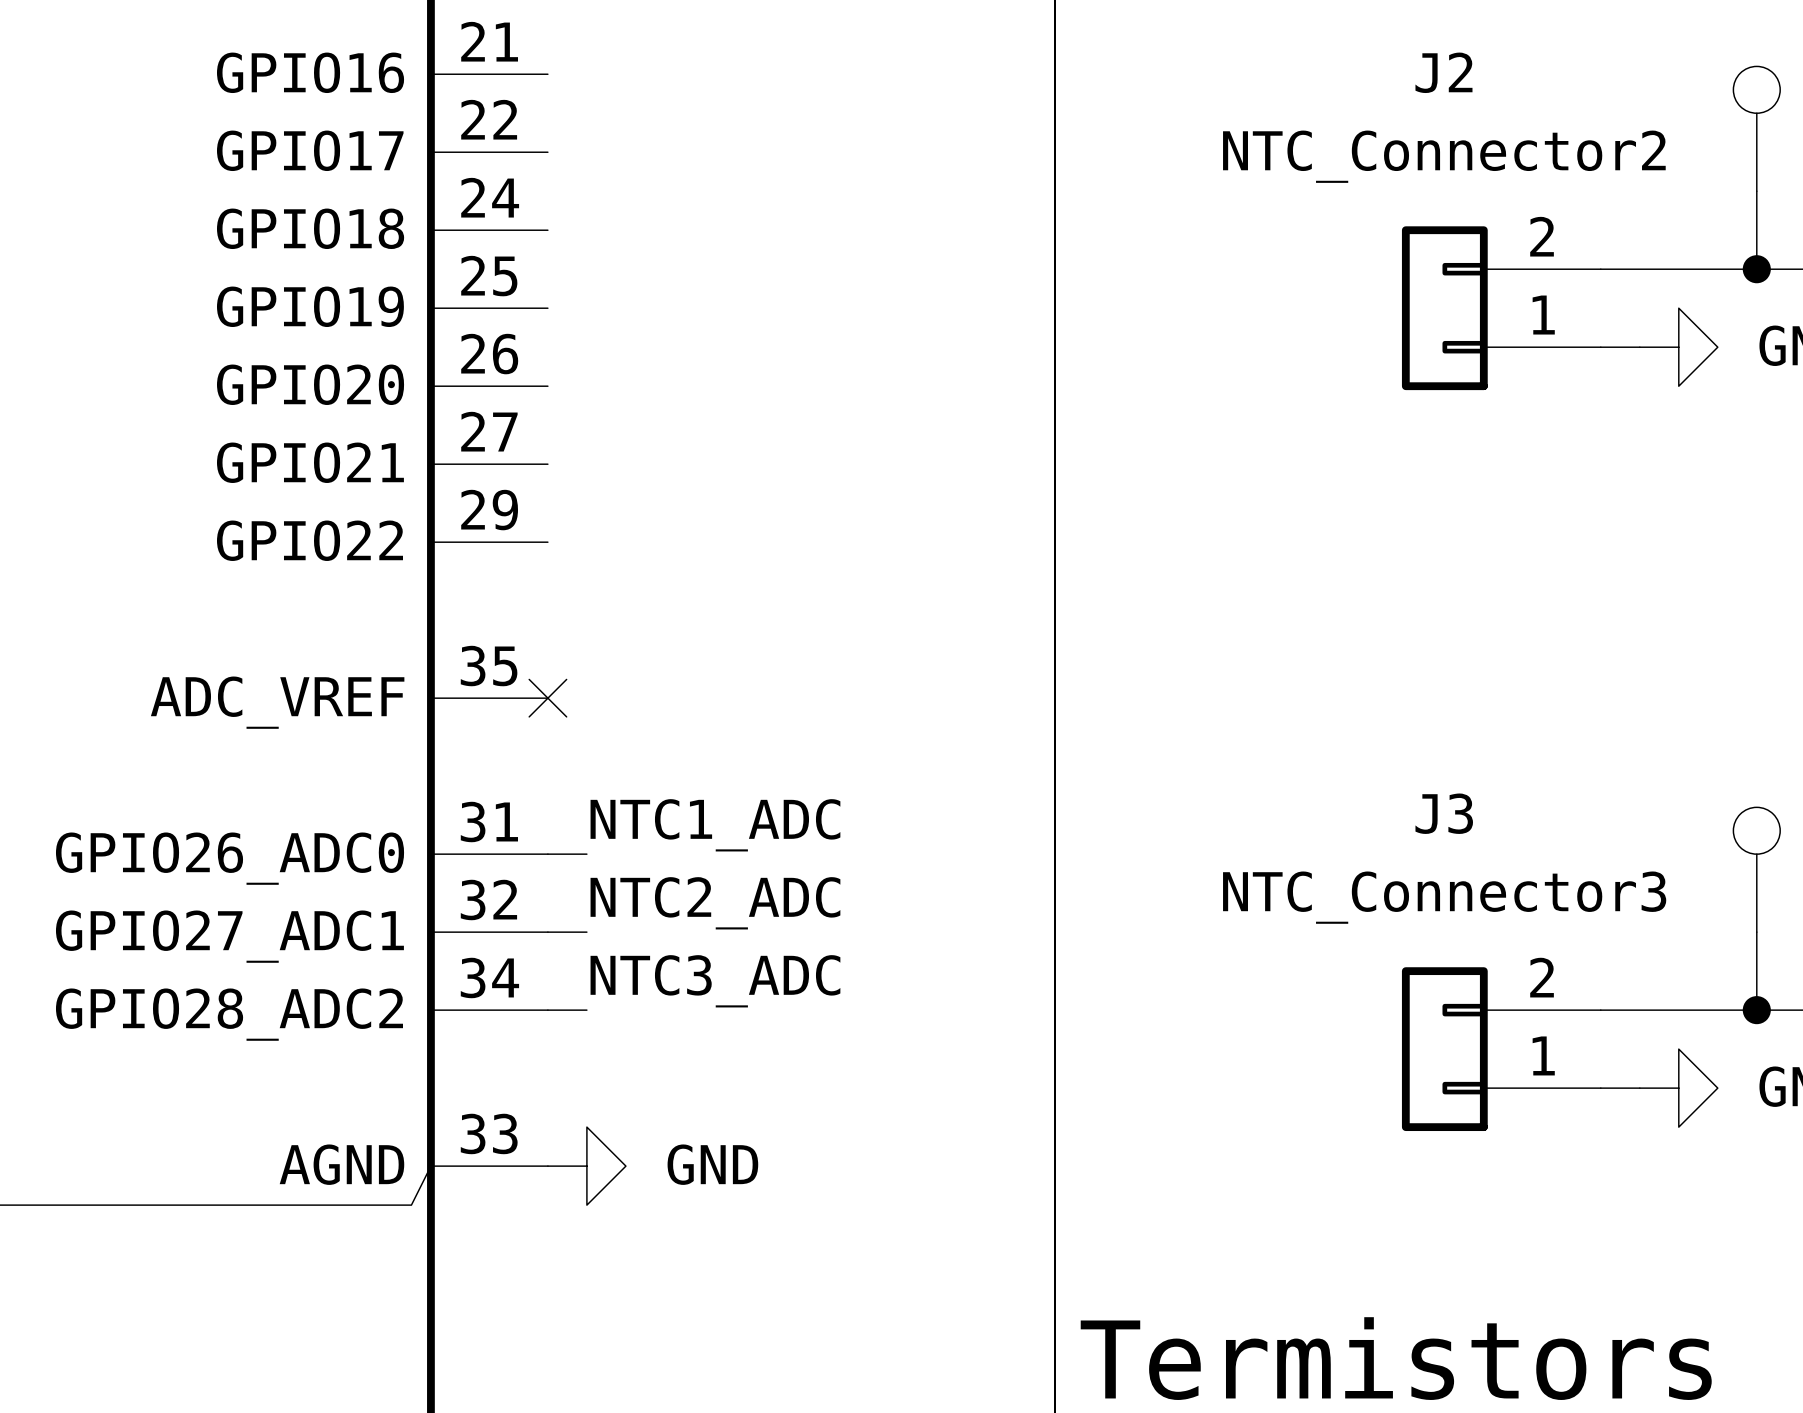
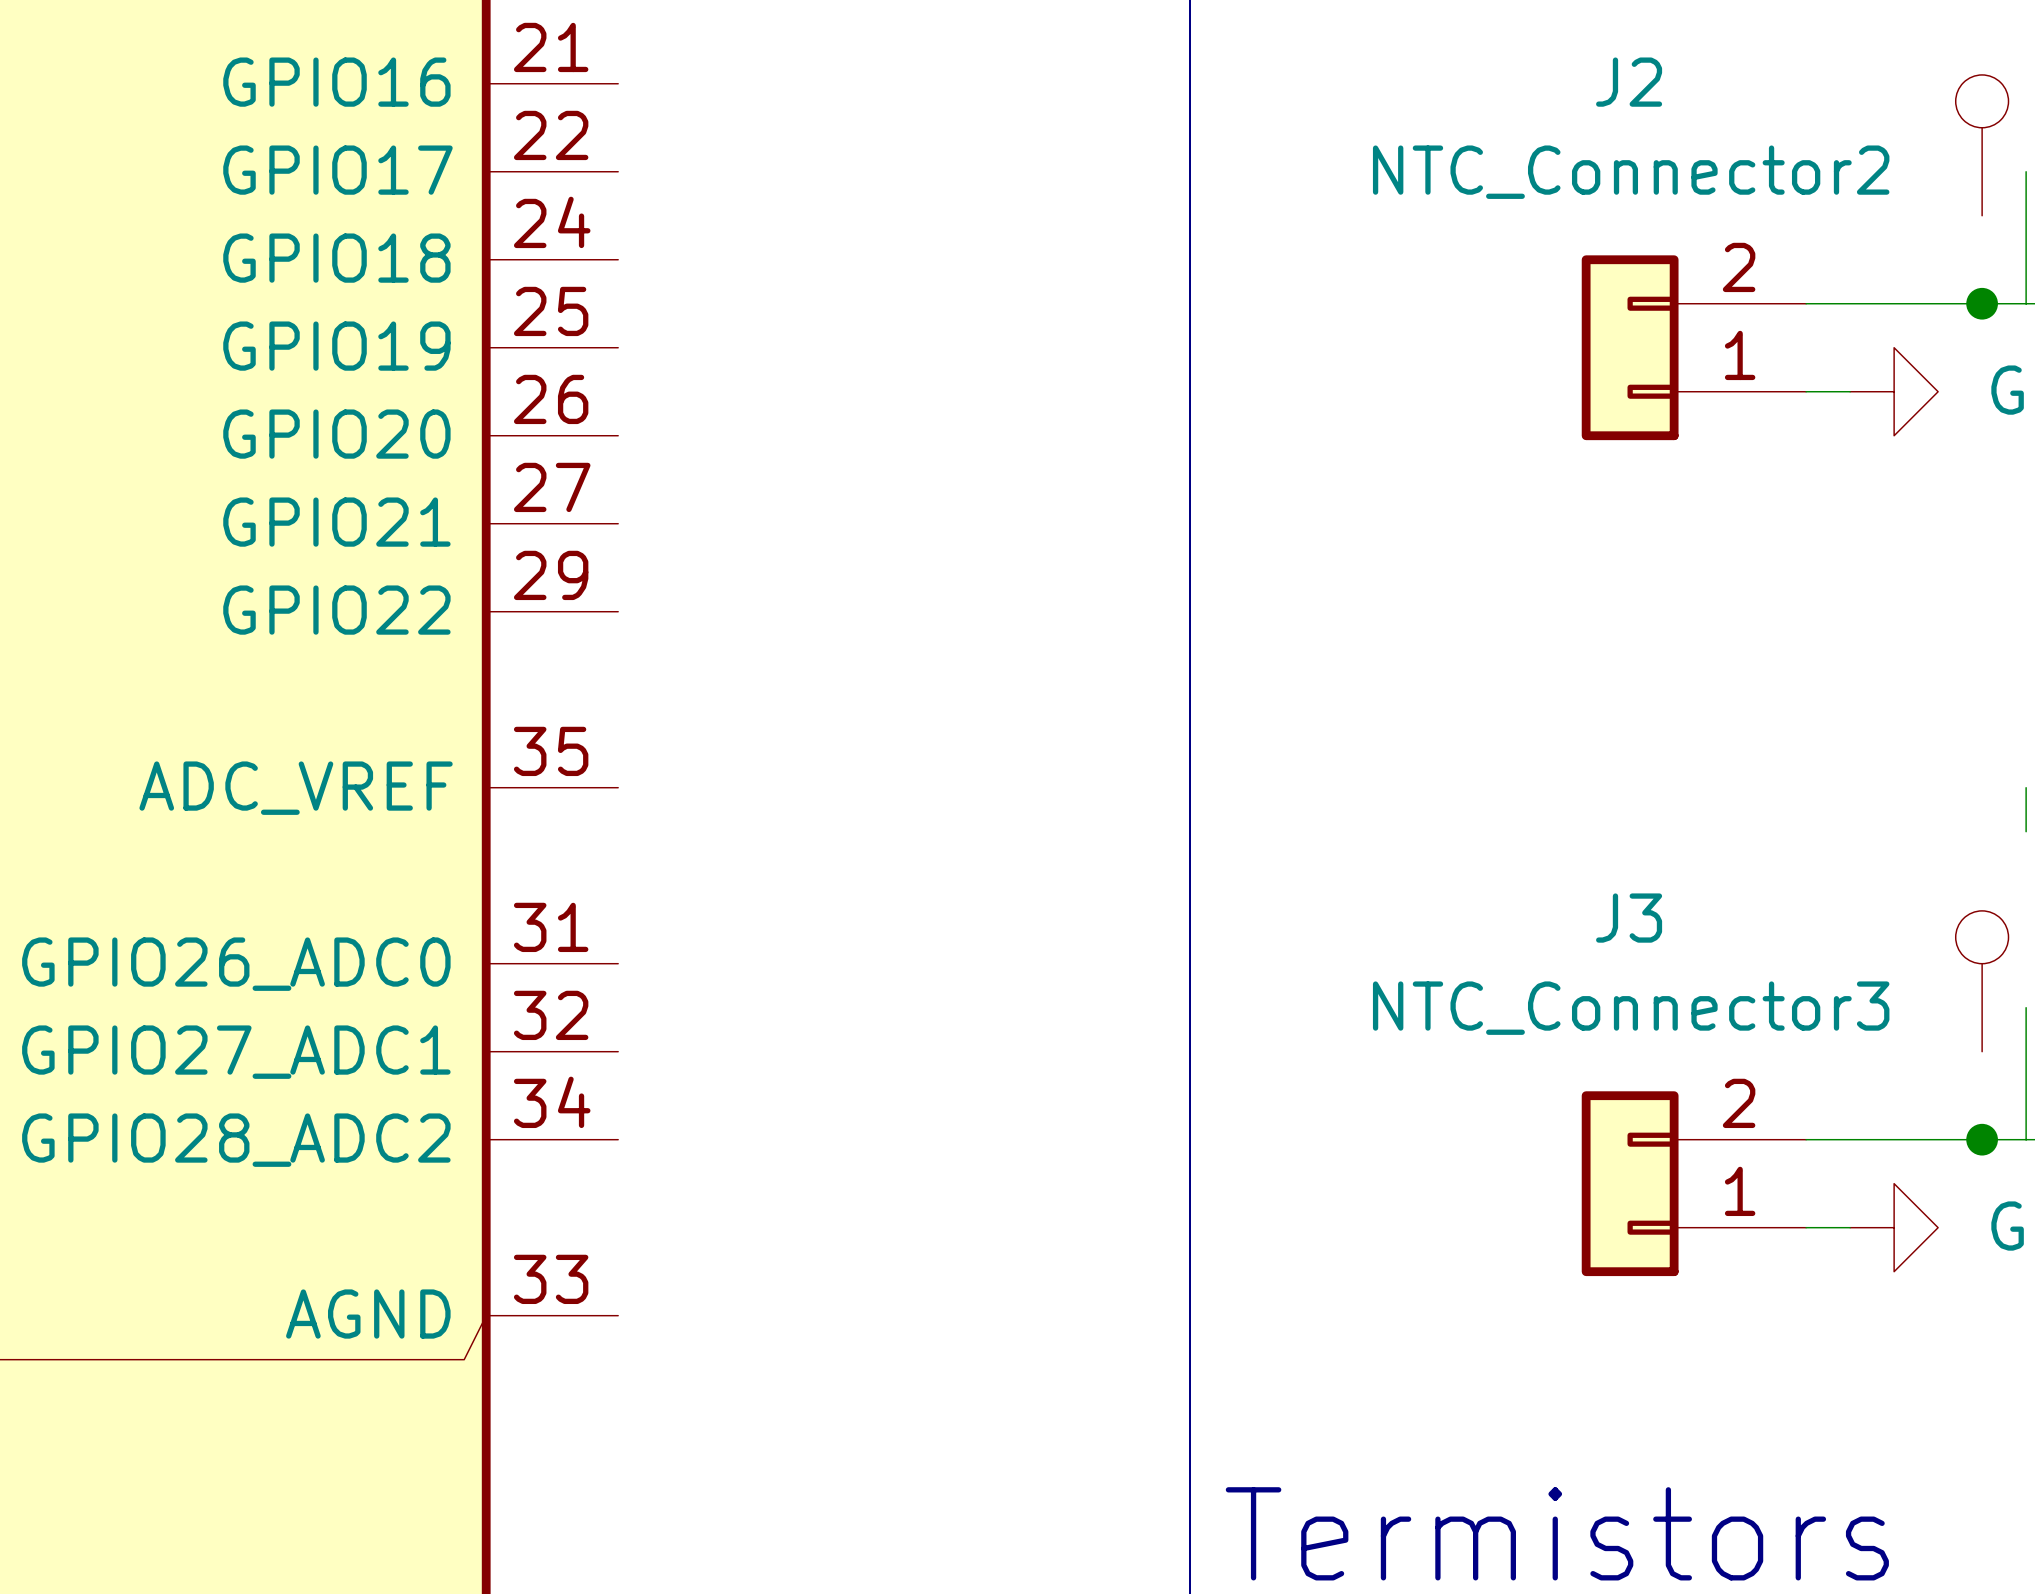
wire: none -> (2026, 171) (2026, 303)
wire: (1756, 191) (1756, 269) -> none
no-connect mark: (547, 698) -> none
wire: none -> (2026, 787) (2026, 831)
label: NTC1_ADC (715, 825) -> none
wire: (547, 854) (586, 854) -> none
wire: none -> (2026, 1007) (2026, 1139)
label: NTC2_ADC (715, 903) -> none
wire: (547, 932) (586, 932) -> none
wire: (1756, 932) (1756, 1010) -> none
label: NTC3_ADC (715, 981) -> none
wire: (547, 1010) (586, 1010) -> none
power symbol: GND (586, 1166) -> none

